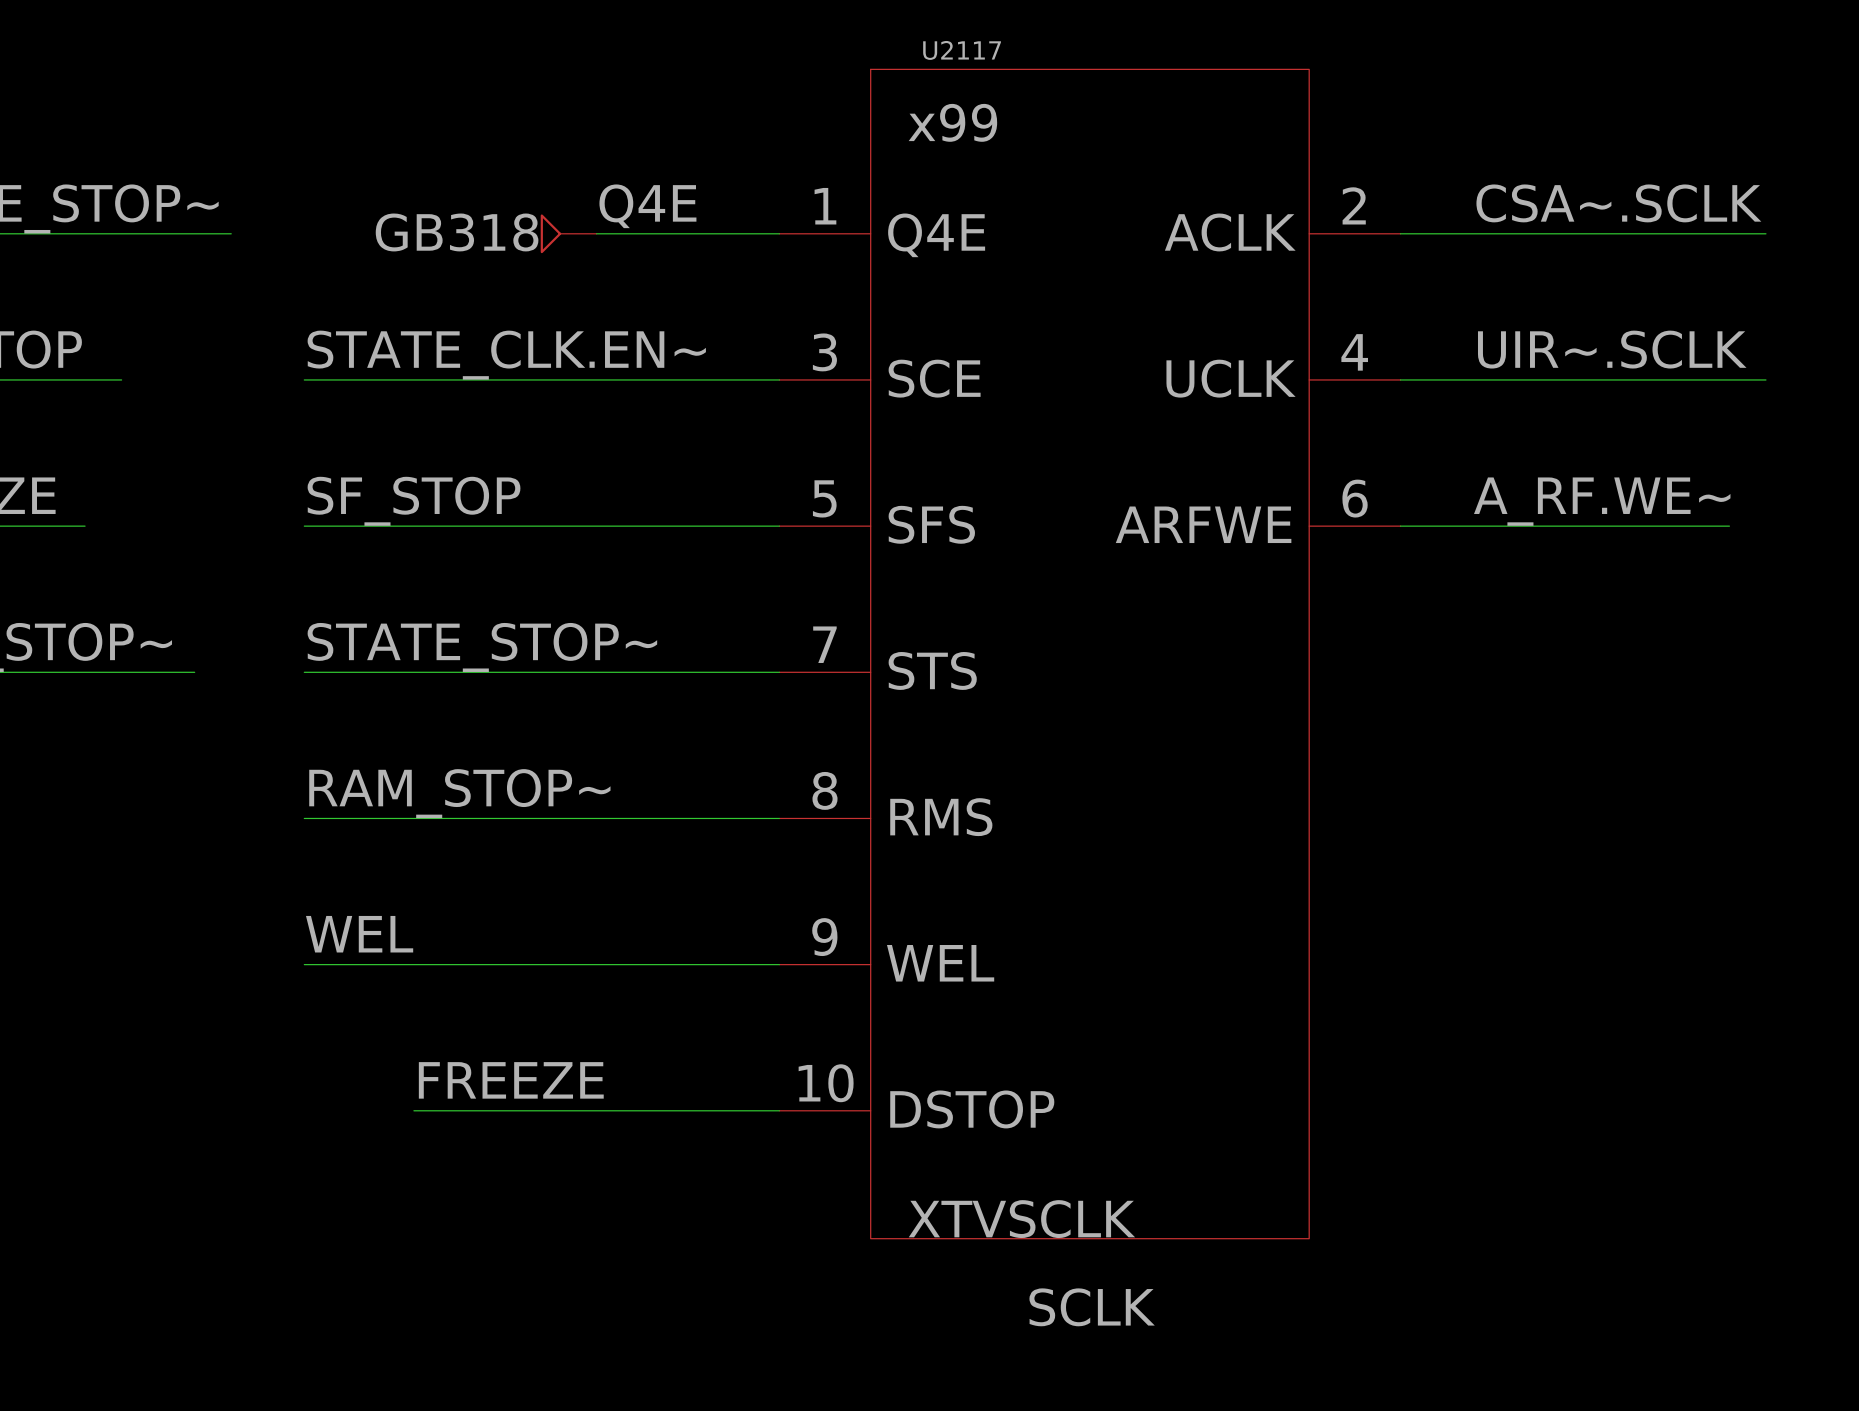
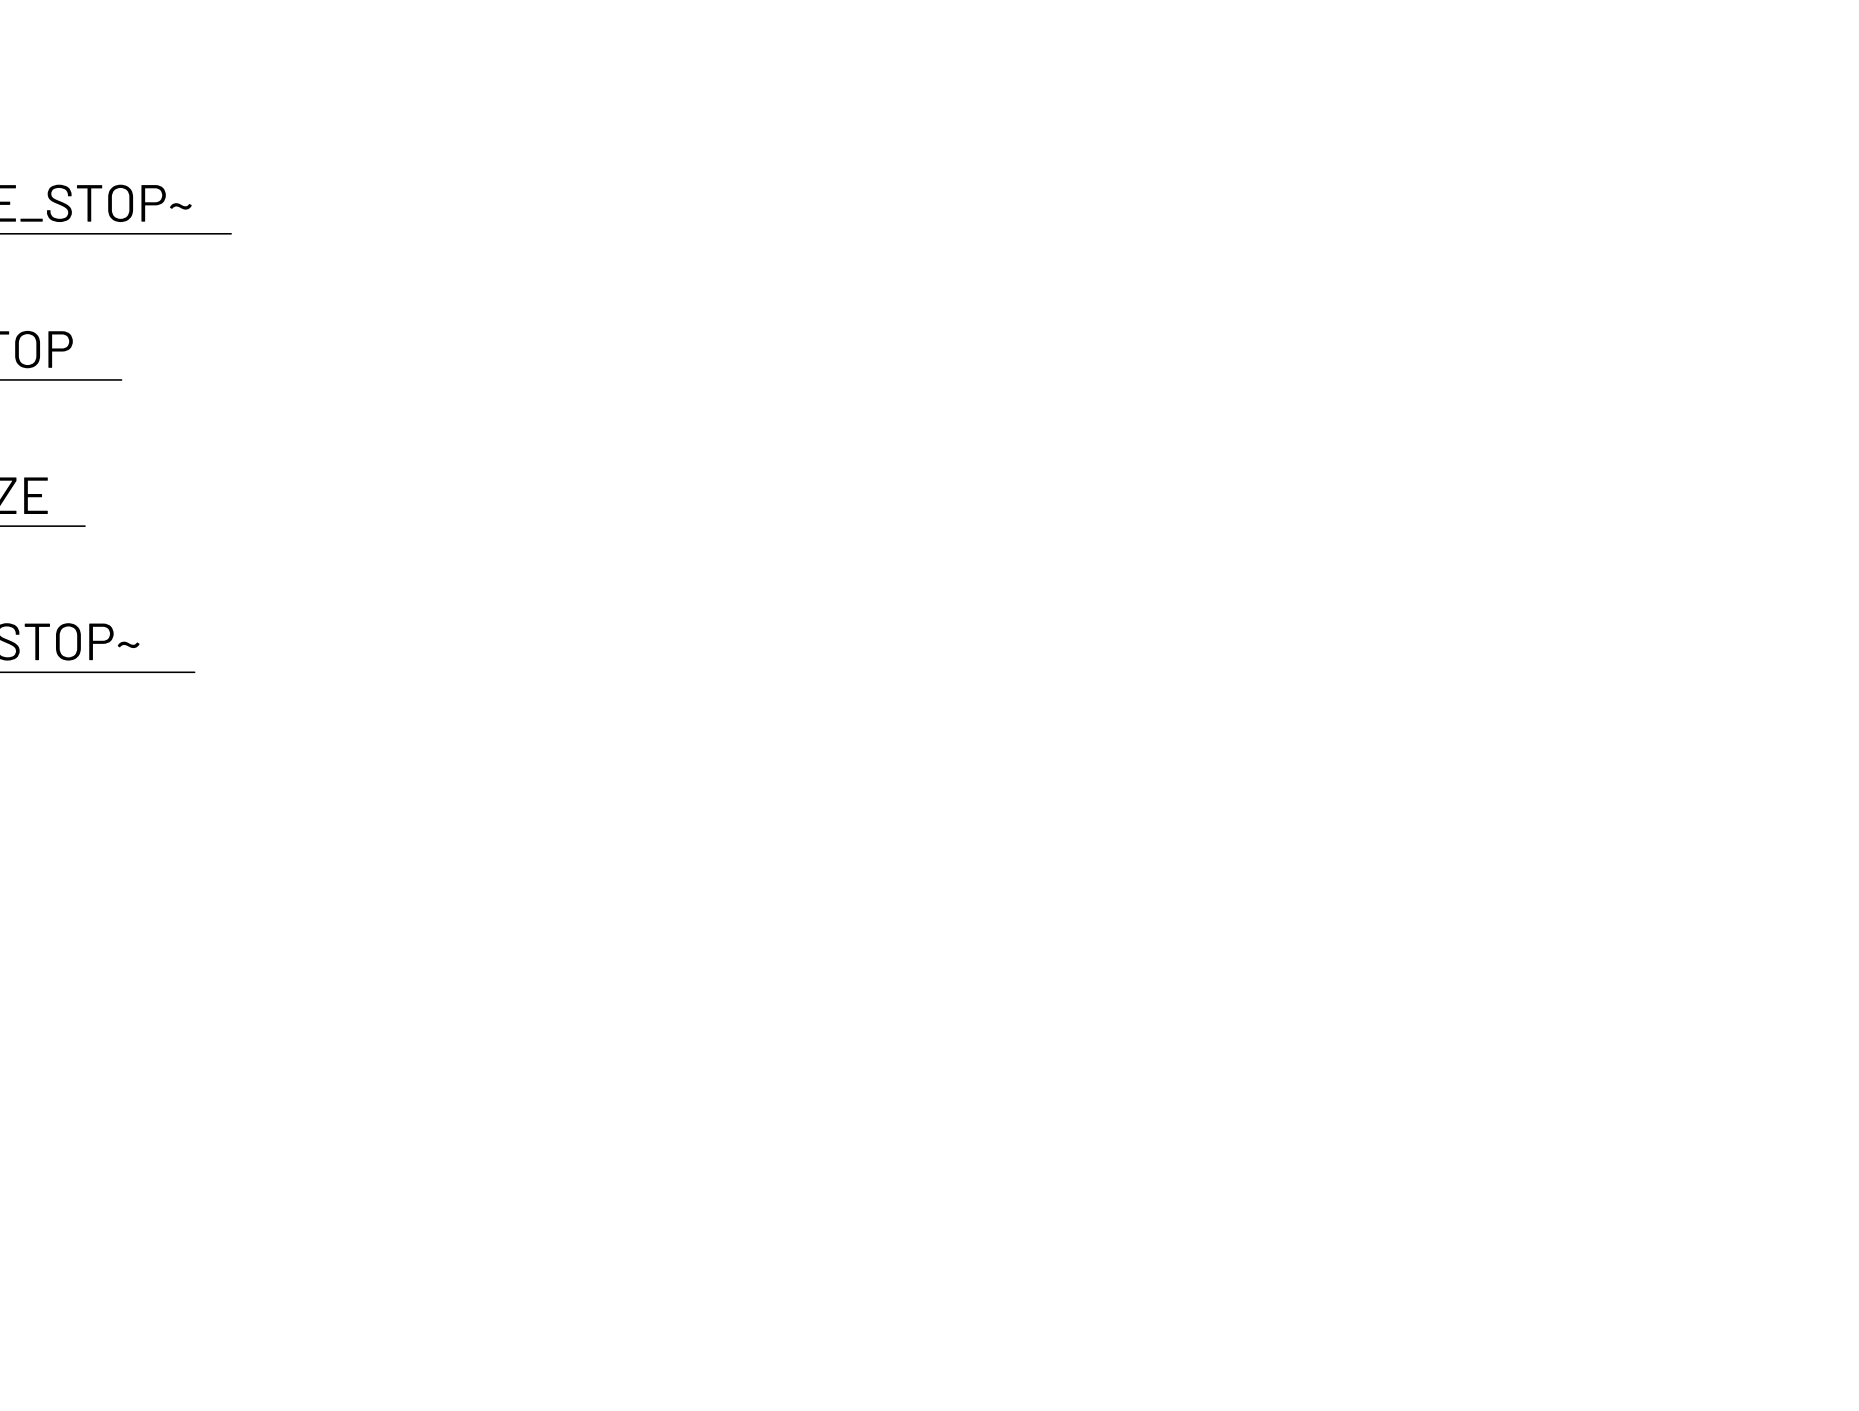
label: CSA~.SCLK (1618, 203) -> none
label: Q4E (647, 206) -> none
GB318: (568, 233) -> none
wire: (596, 233) (779, 233) -> none
wire: (1400, 233) (1765, 233) -> none
label: UIR~.SCLK (1612, 349) -> none
label: STATE_CLK.EN~ (506, 355) -> none
wire: (304, 379) (779, 379) -> none
wire: (1400, 379) (1765, 379) -> none
label: SF_STOP (414, 501) -> none
label: A_RF.WE~ (1602, 501) -> none
wire: (304, 526) (779, 526) -> none
wire: (1400, 526) (1729, 526) -> none
label: STATE_STOP~ (482, 647) -> none
U2117: XTVSCLK (1089, 654) -> none
wire: (304, 672) (779, 672) -> none
label: RAM_STOP~ (459, 793) -> none
wire: (304, 818) (779, 818) -> none
label: WEL (359, 934) -> none
wire: (304, 964) (779, 964) -> none
label: FREEZE (511, 1080) -> none
wire: (413, 1110) (779, 1110) -> none

